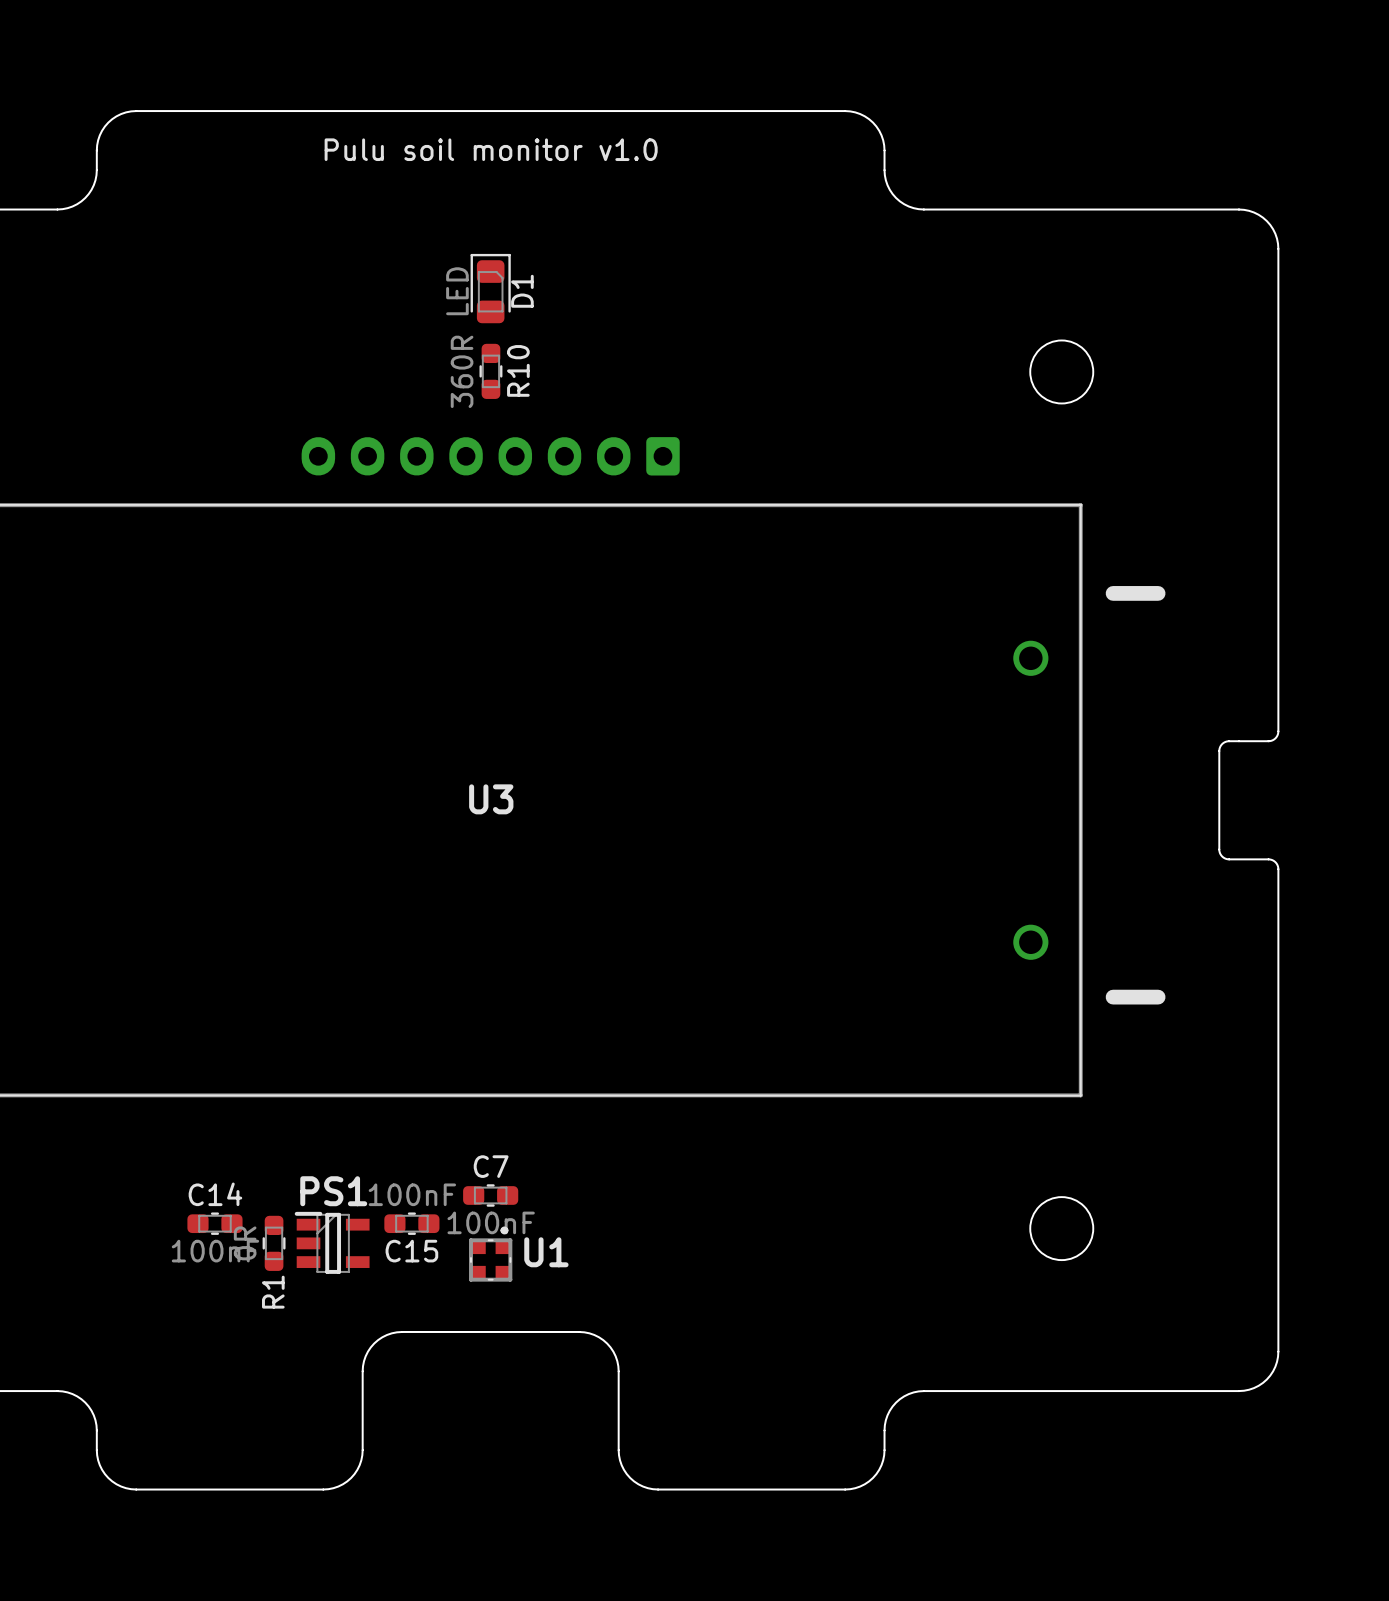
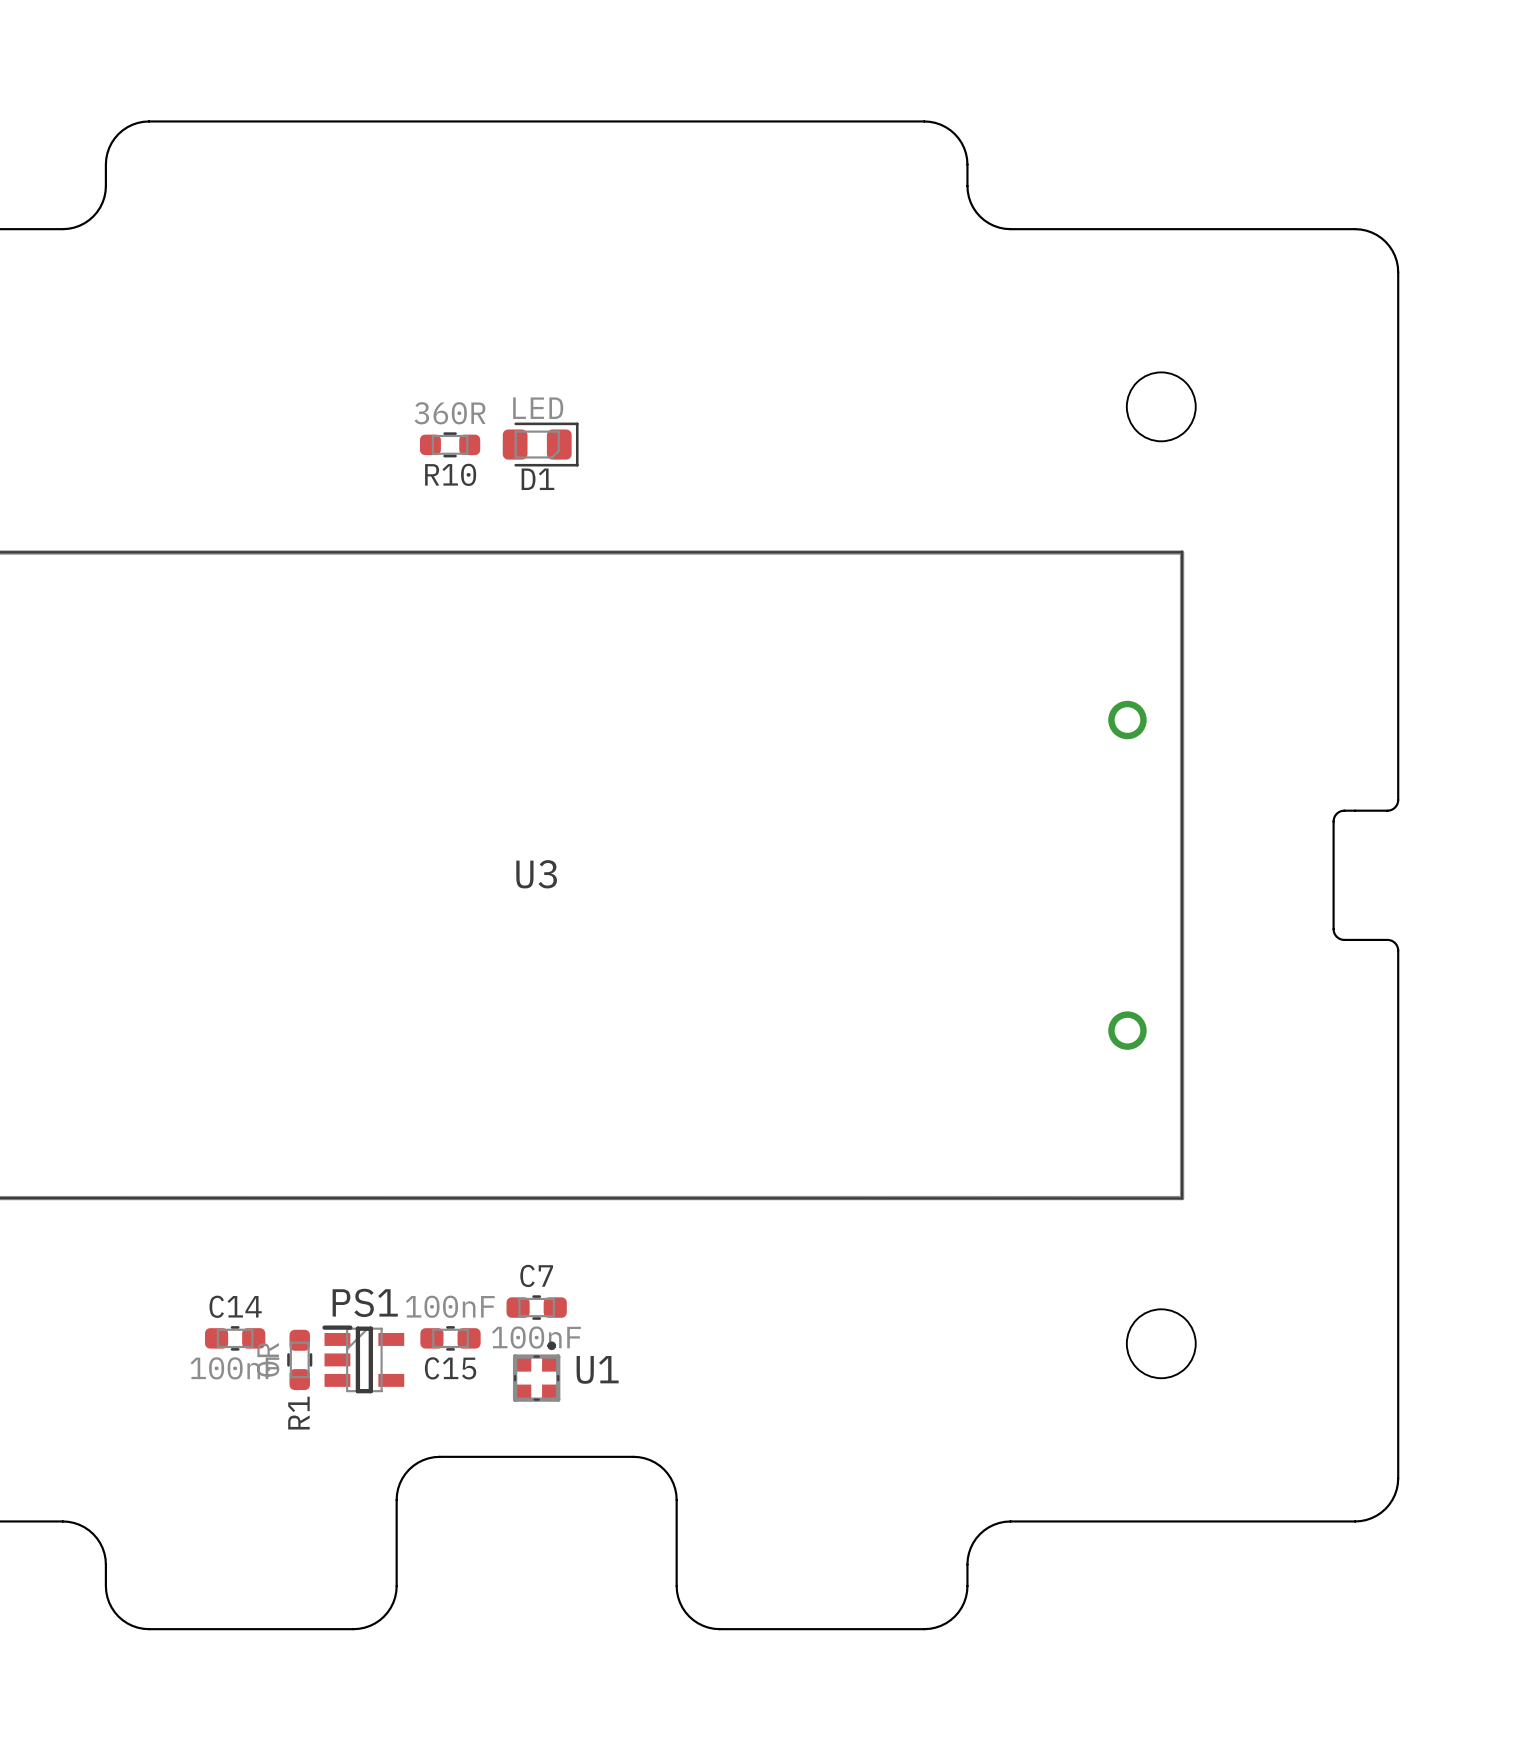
text: Pulu soil monitor v1.0 (491, 149) -> none
D1 rotation: 0° (490, 288) -> 90° clockwise (540, 444)
D1 position: (490, 288) -> (540, 444)
R10 rotation: 0° (490, 371) -> 90° clockwise (450, 444)
R10 position: (490, 371) -> (450, 444)
part: (490, 456) -> none
text: - (1135, 593) -> none
text: - (1135, 997) -> none

